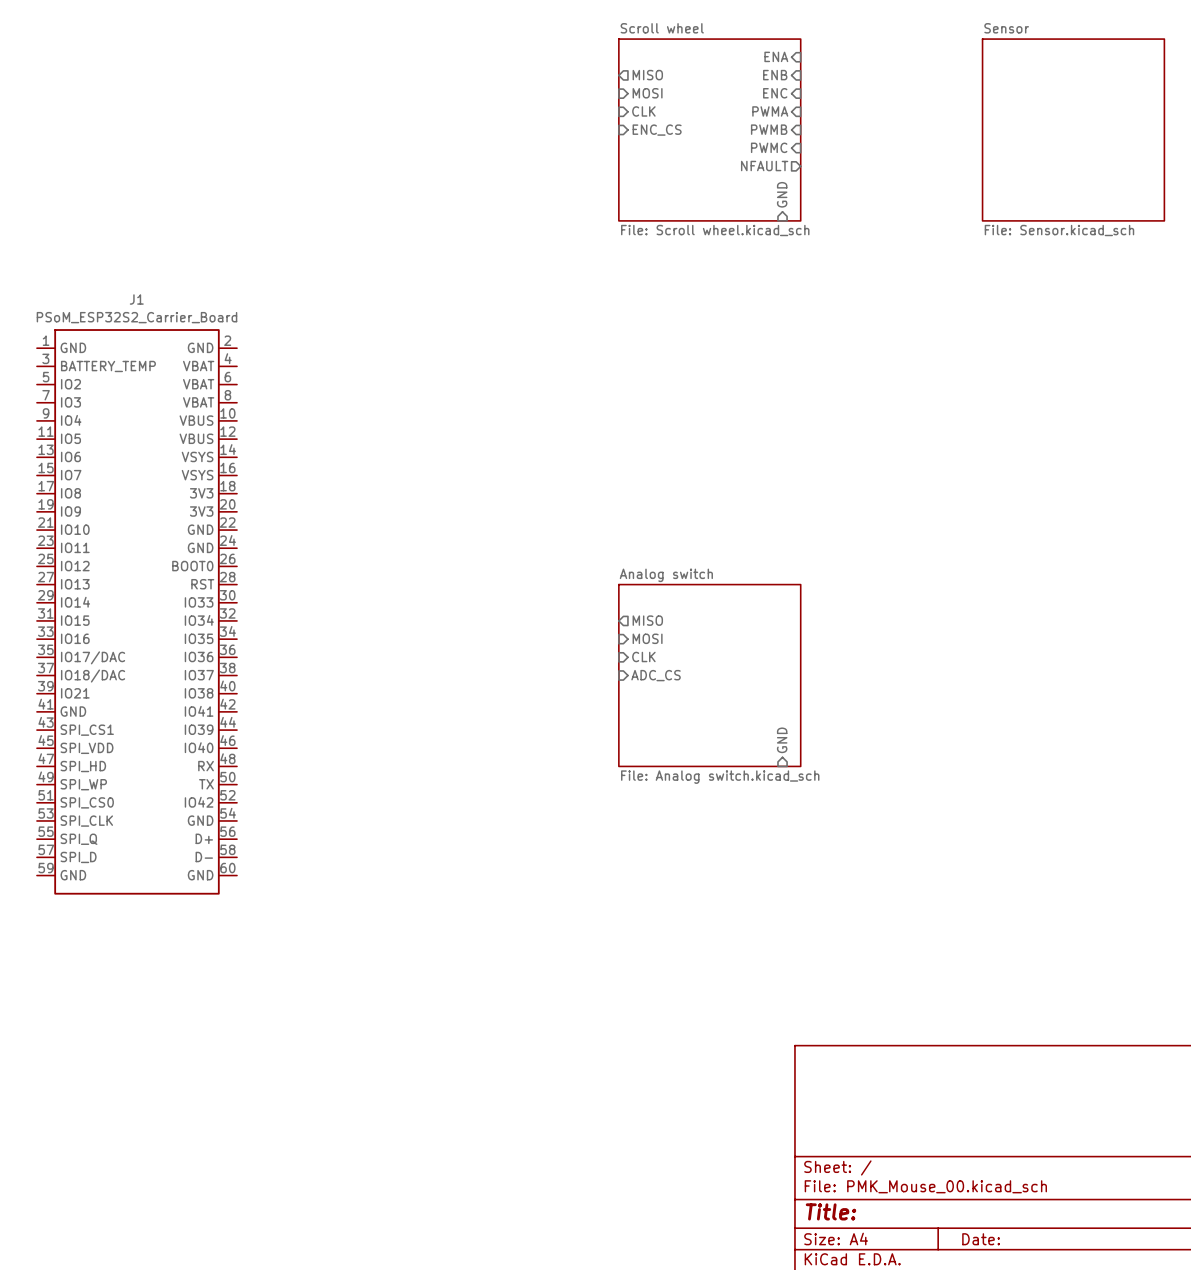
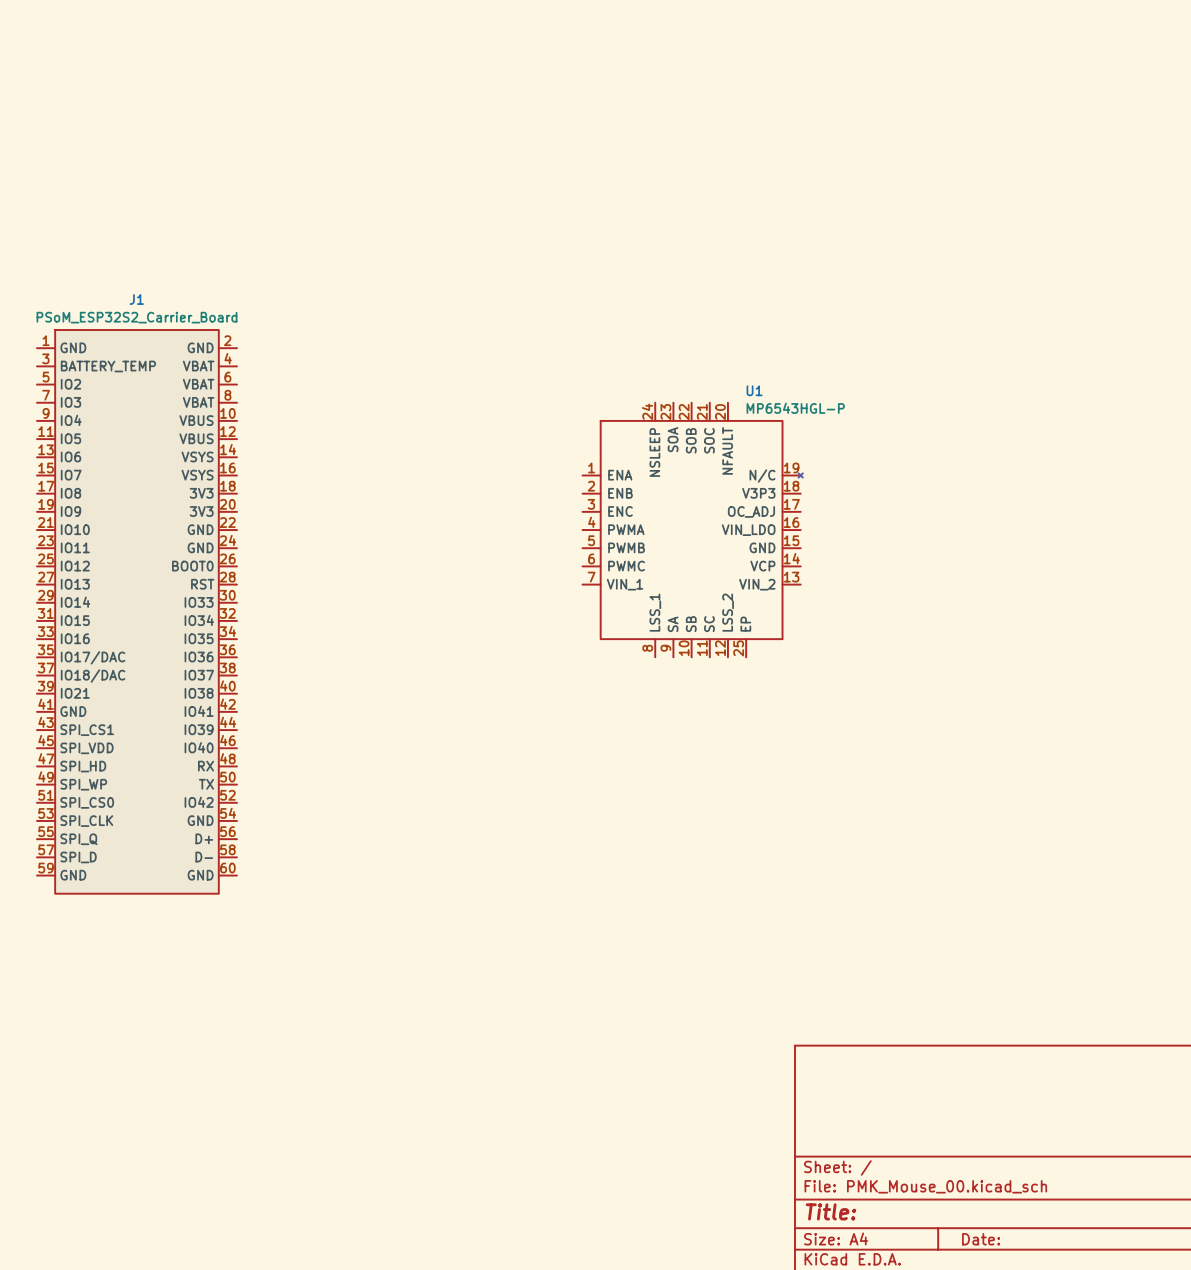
sheet pin: ENA (776, 56) -> none
sheet pin: MISO (647, 75) -> none
sheet pin: ENB (775, 75) -> none
sheet pin: MOSI (647, 93) -> none
sheet pin: ENC (775, 93) -> none
sheet pin: CLK (643, 111) -> none
sheet pin: PWMA (770, 111) -> none
sheet Scroll wheel: File: Scroll wheel.kicad_sch (709, 129) -> none
sheet pin: PWMB (769, 129) -> none
sheet Sensor: File: Sensor.kicad_sch (1073, 129) -> none
sheet pin: ENC_CS (657, 130) -> none
sheet pin: PWMC (769, 147) -> none
sheet pin: NFAULT (764, 166) -> none
sheet pin: GND (782, 194) -> none
U1: none -> MP6543HGL-P (692, 530)
sheet pin: MISO (647, 620) -> none
sheet pin: MOSI (647, 638) -> none
sheet pin: CLK (643, 656) -> none
sheet pin: ADC_CS (656, 675) -> none
sheet Analog switch: File: Analog switch.kicad_sch (709, 675) -> none
sheet pin: GND (782, 740) -> none

